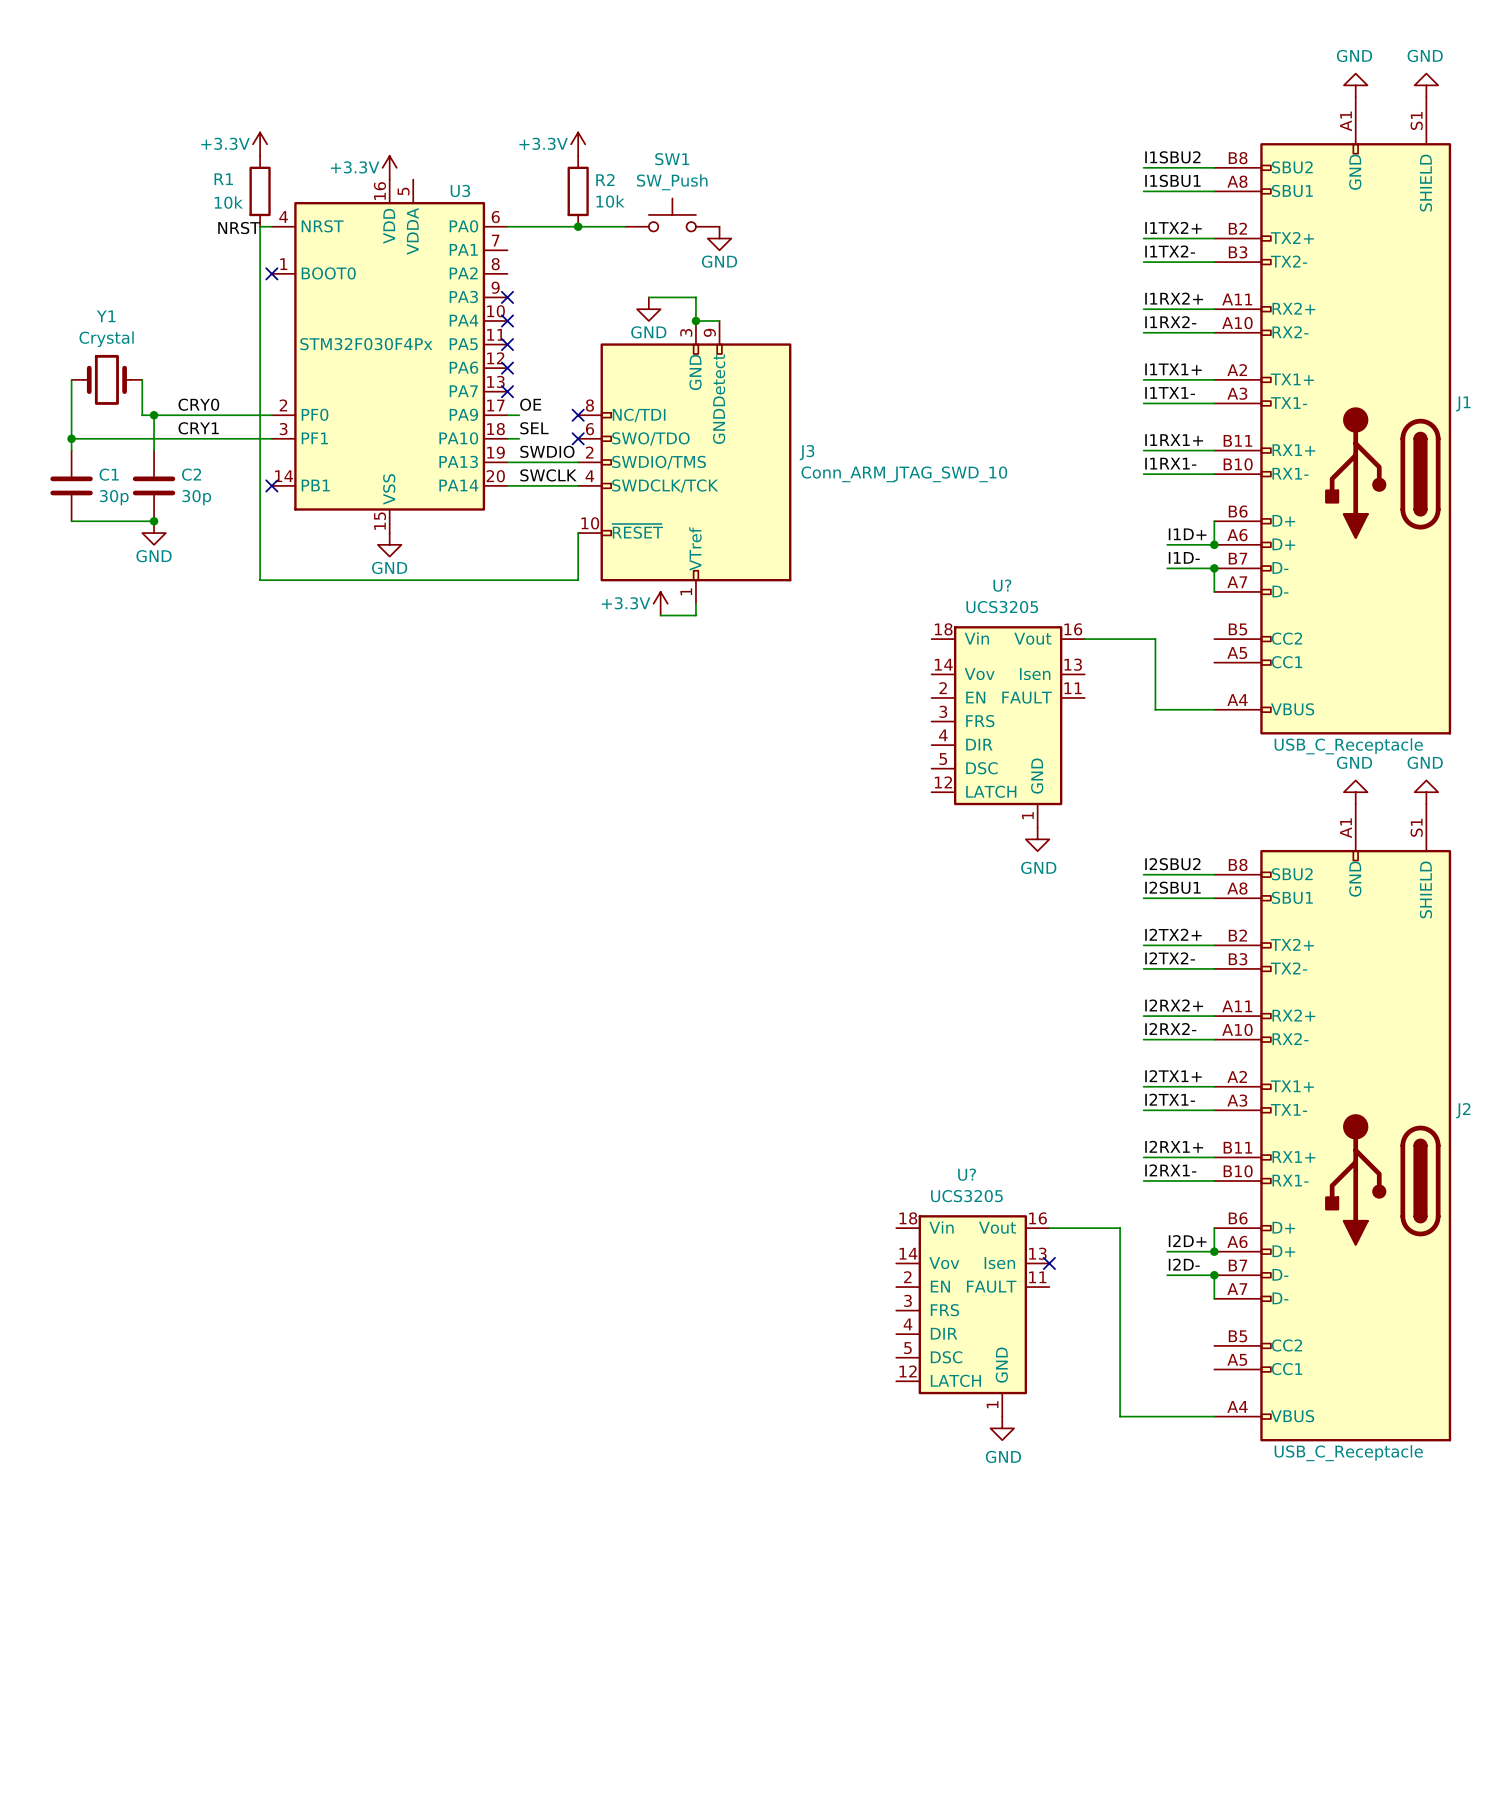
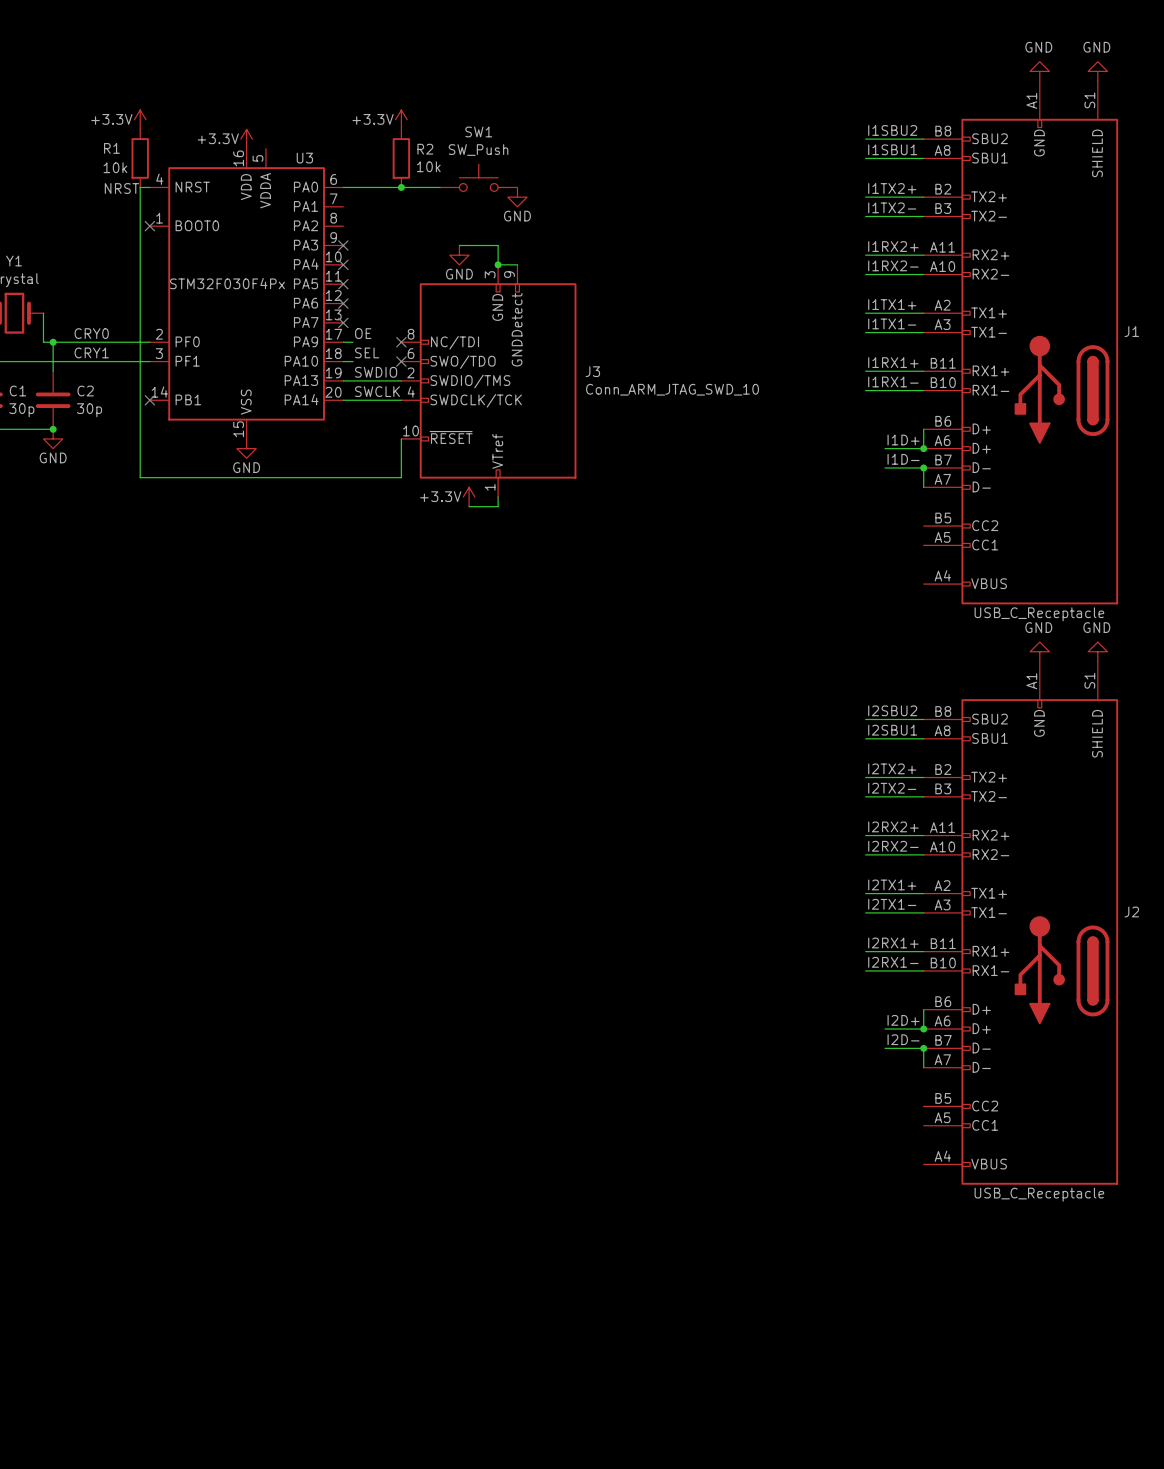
wire: (1084, 639) (1155, 639) (1155, 709) (1214, 709) -> none
U?: UCS3205 (1008, 726) -> none
power symbol: GND (1037, 839) -> none
wire: (1049, 1228) (1120, 1228) (1120, 1416) (1214, 1416) -> none
no-connect mark: (1049, 1263) -> none
U?: UCS3205 (972, 1315) -> none
power symbol: GND (1002, 1428) -> none

